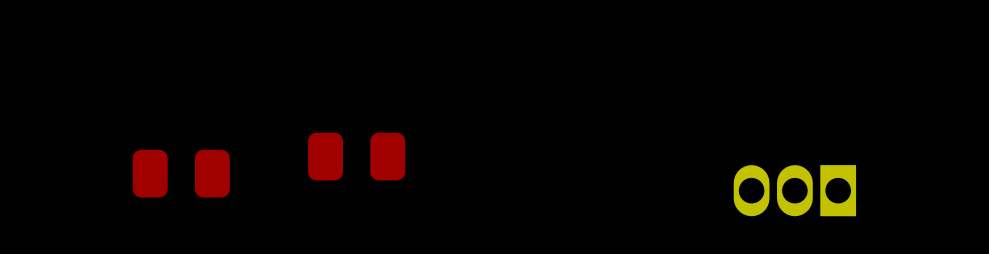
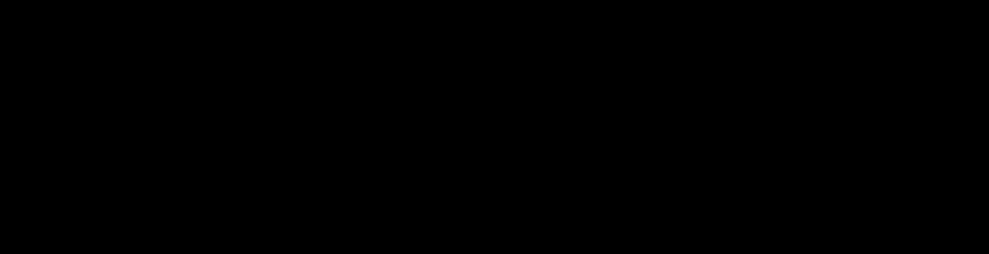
part: (356, 156) -> none
part: (181, 173) -> none
part: (794, 190) -> none

